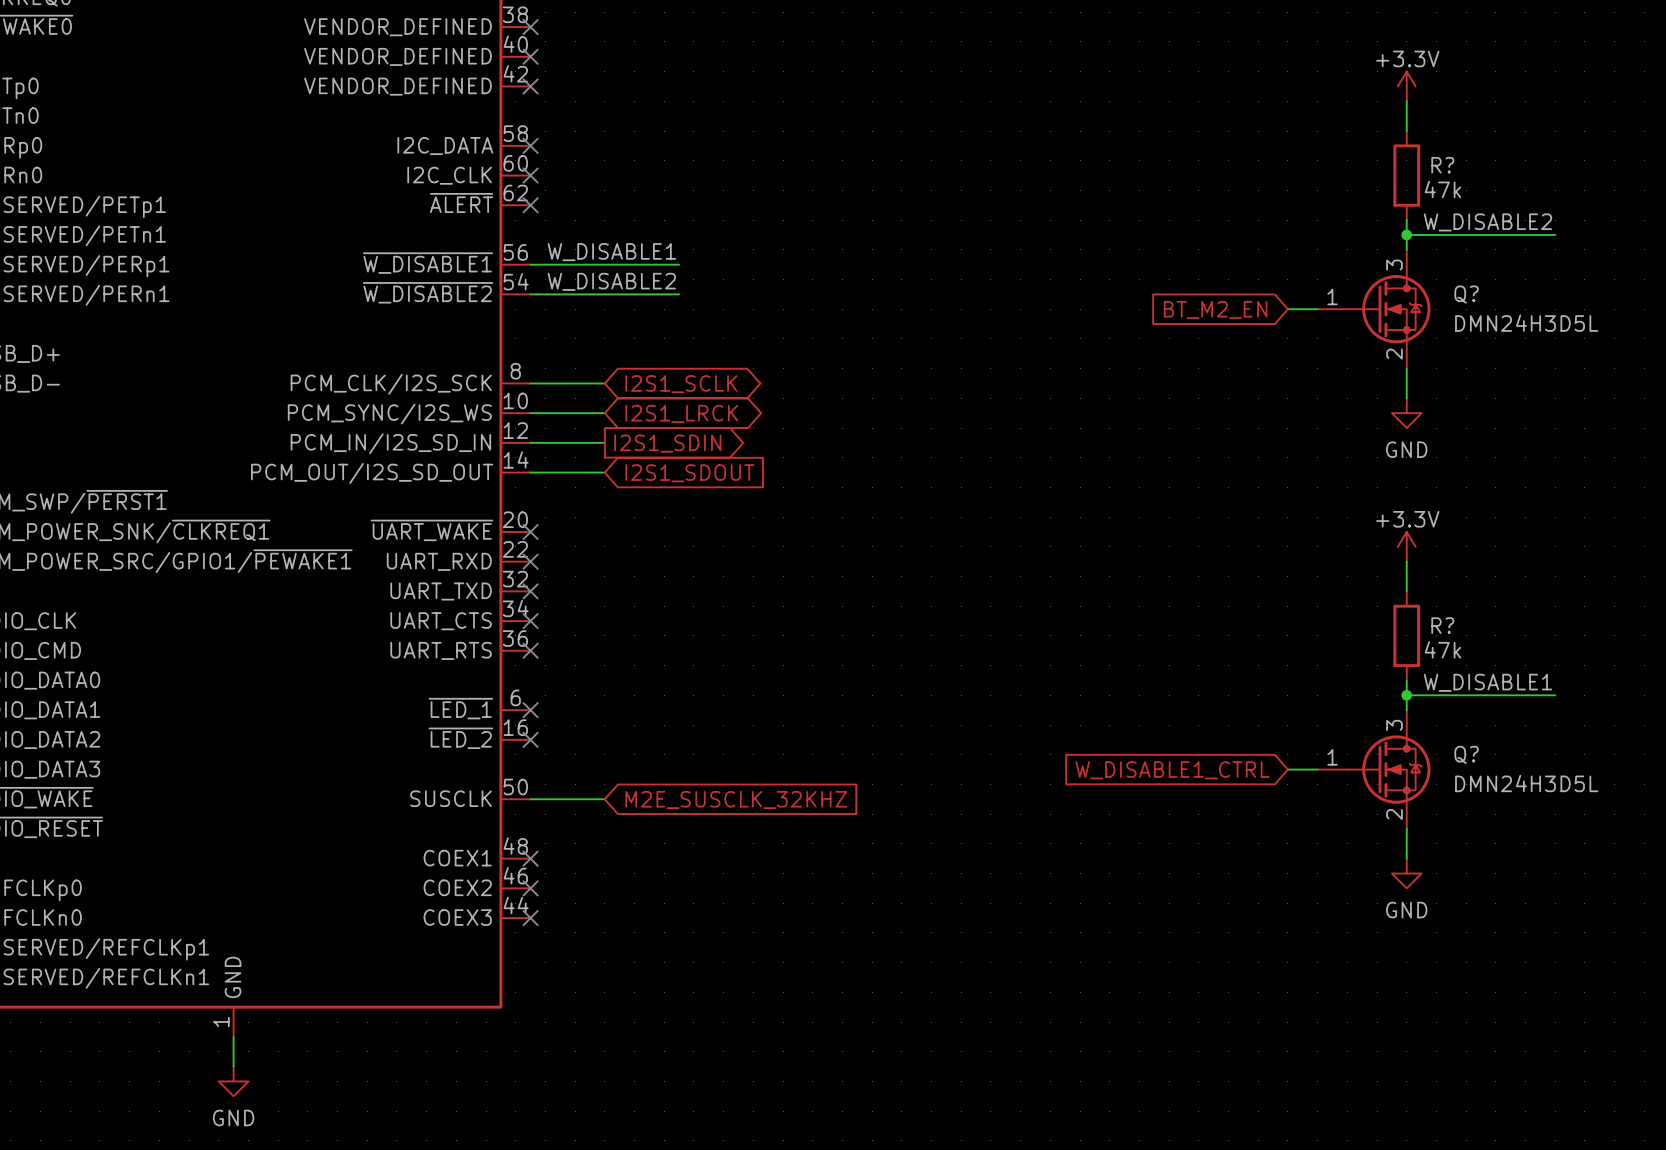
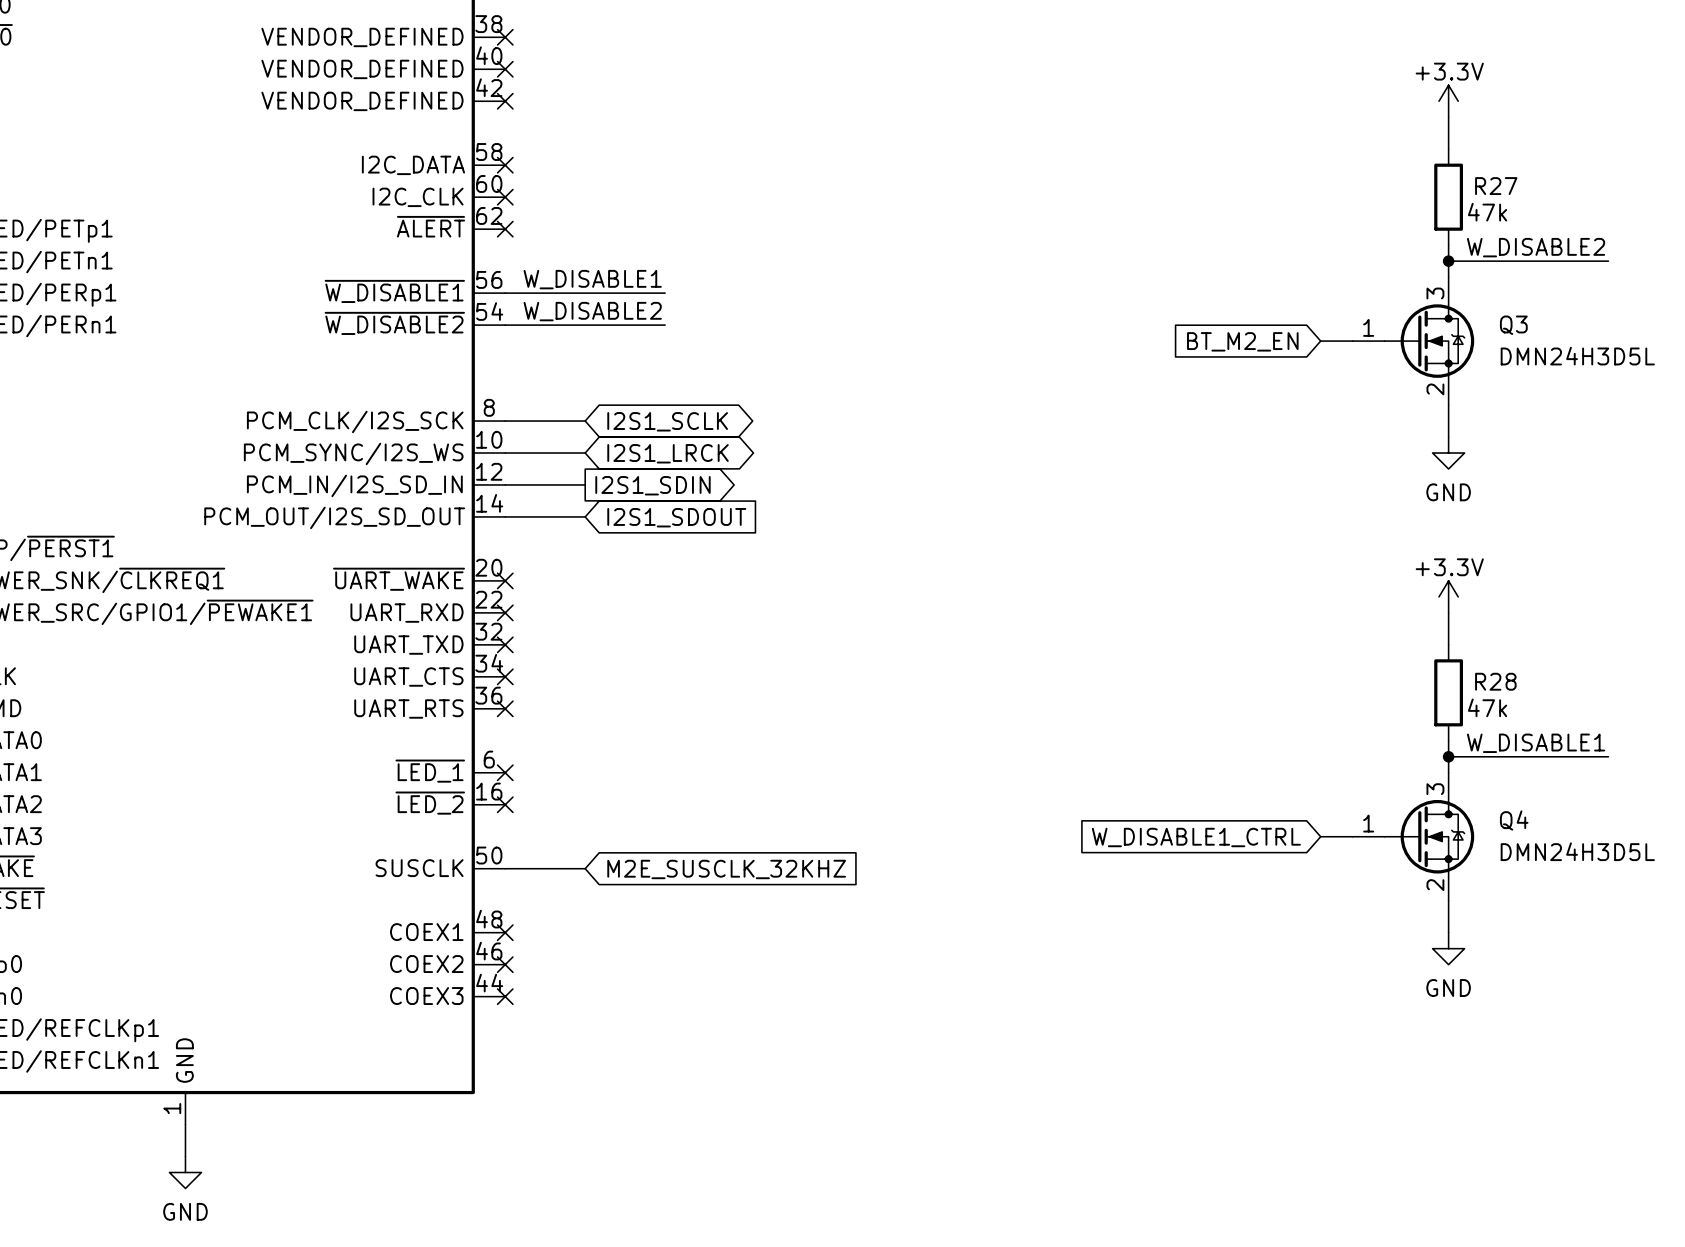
R? name: R? (1442, 165) -> R27 (1496, 186)
Q? name: Q? (1466, 294) -> Q3 (1513, 325)
R? name: R? (1442, 625) -> R28 (1495, 681)
Q? name: Q? (1466, 754) -> Q4 (1514, 820)

